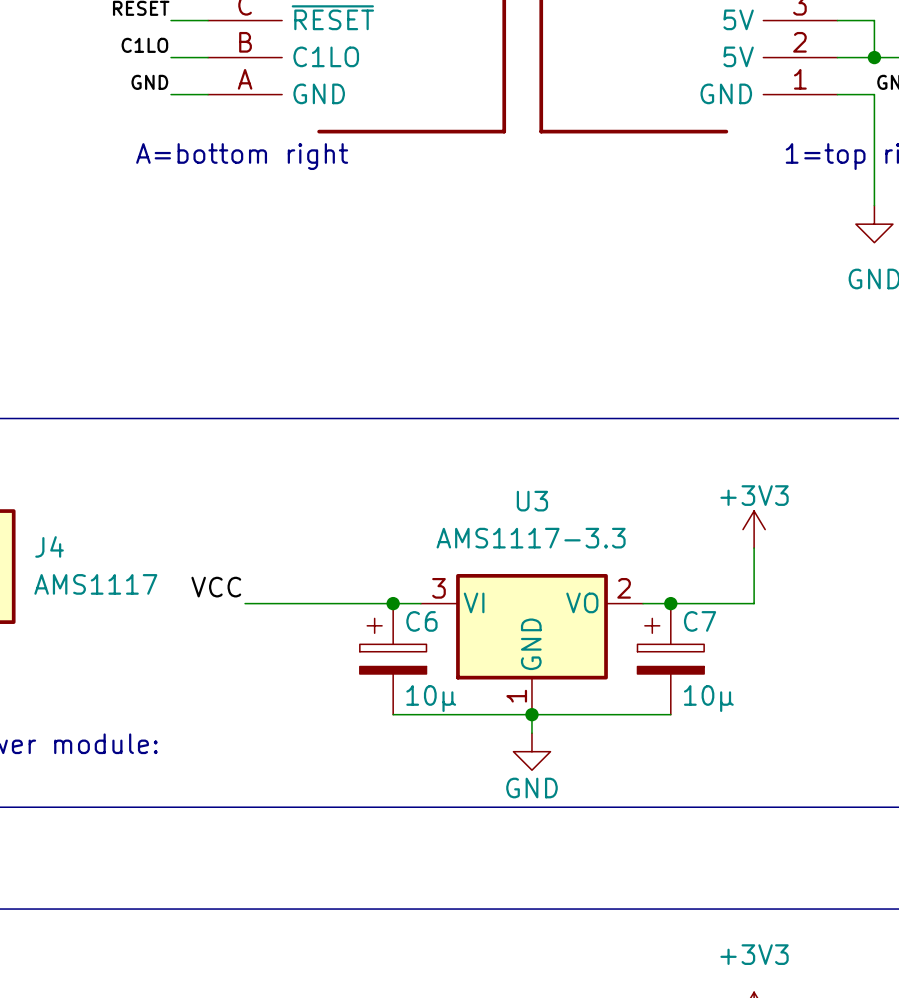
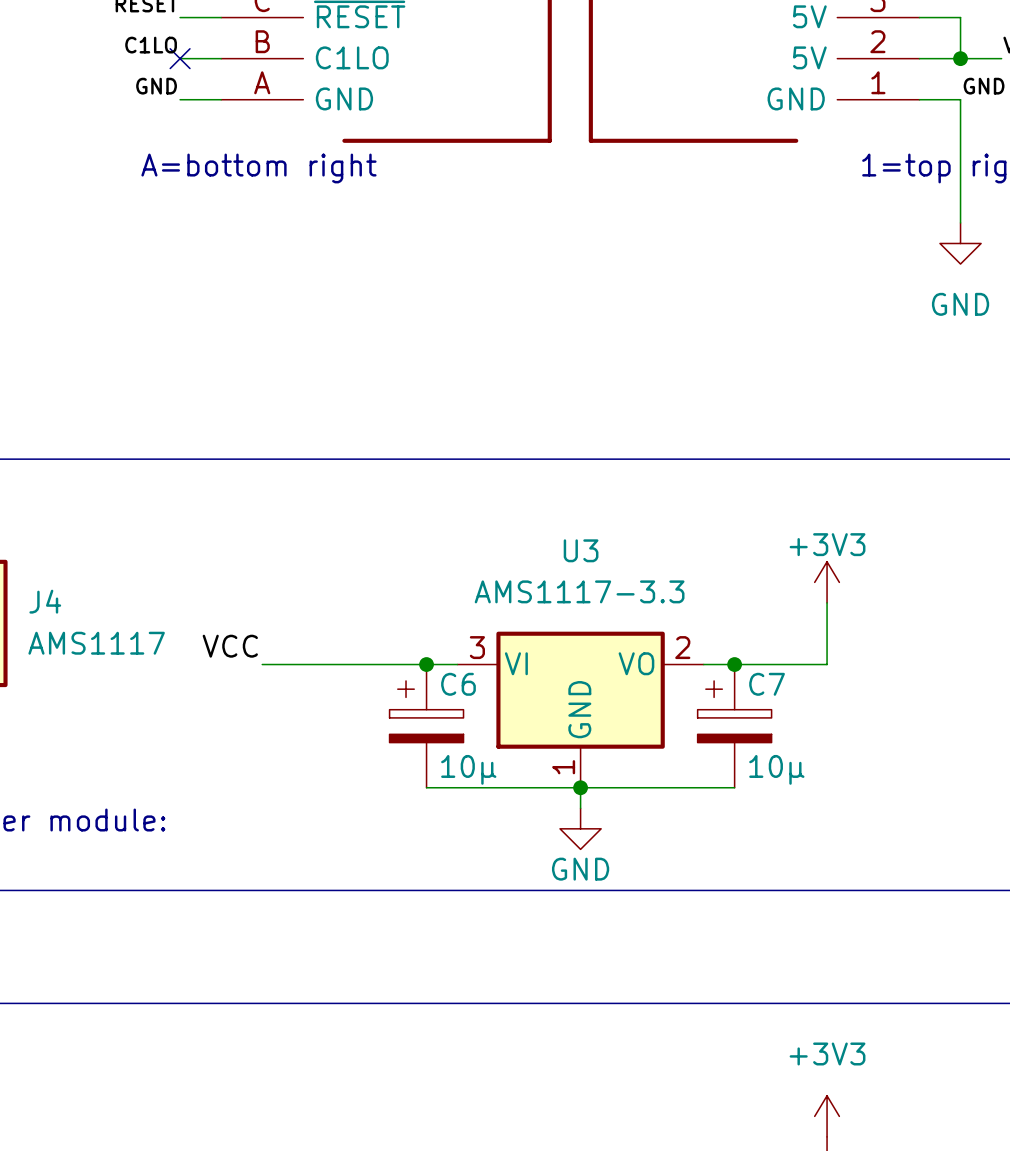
no-connect mark: none -> (180, 58)

